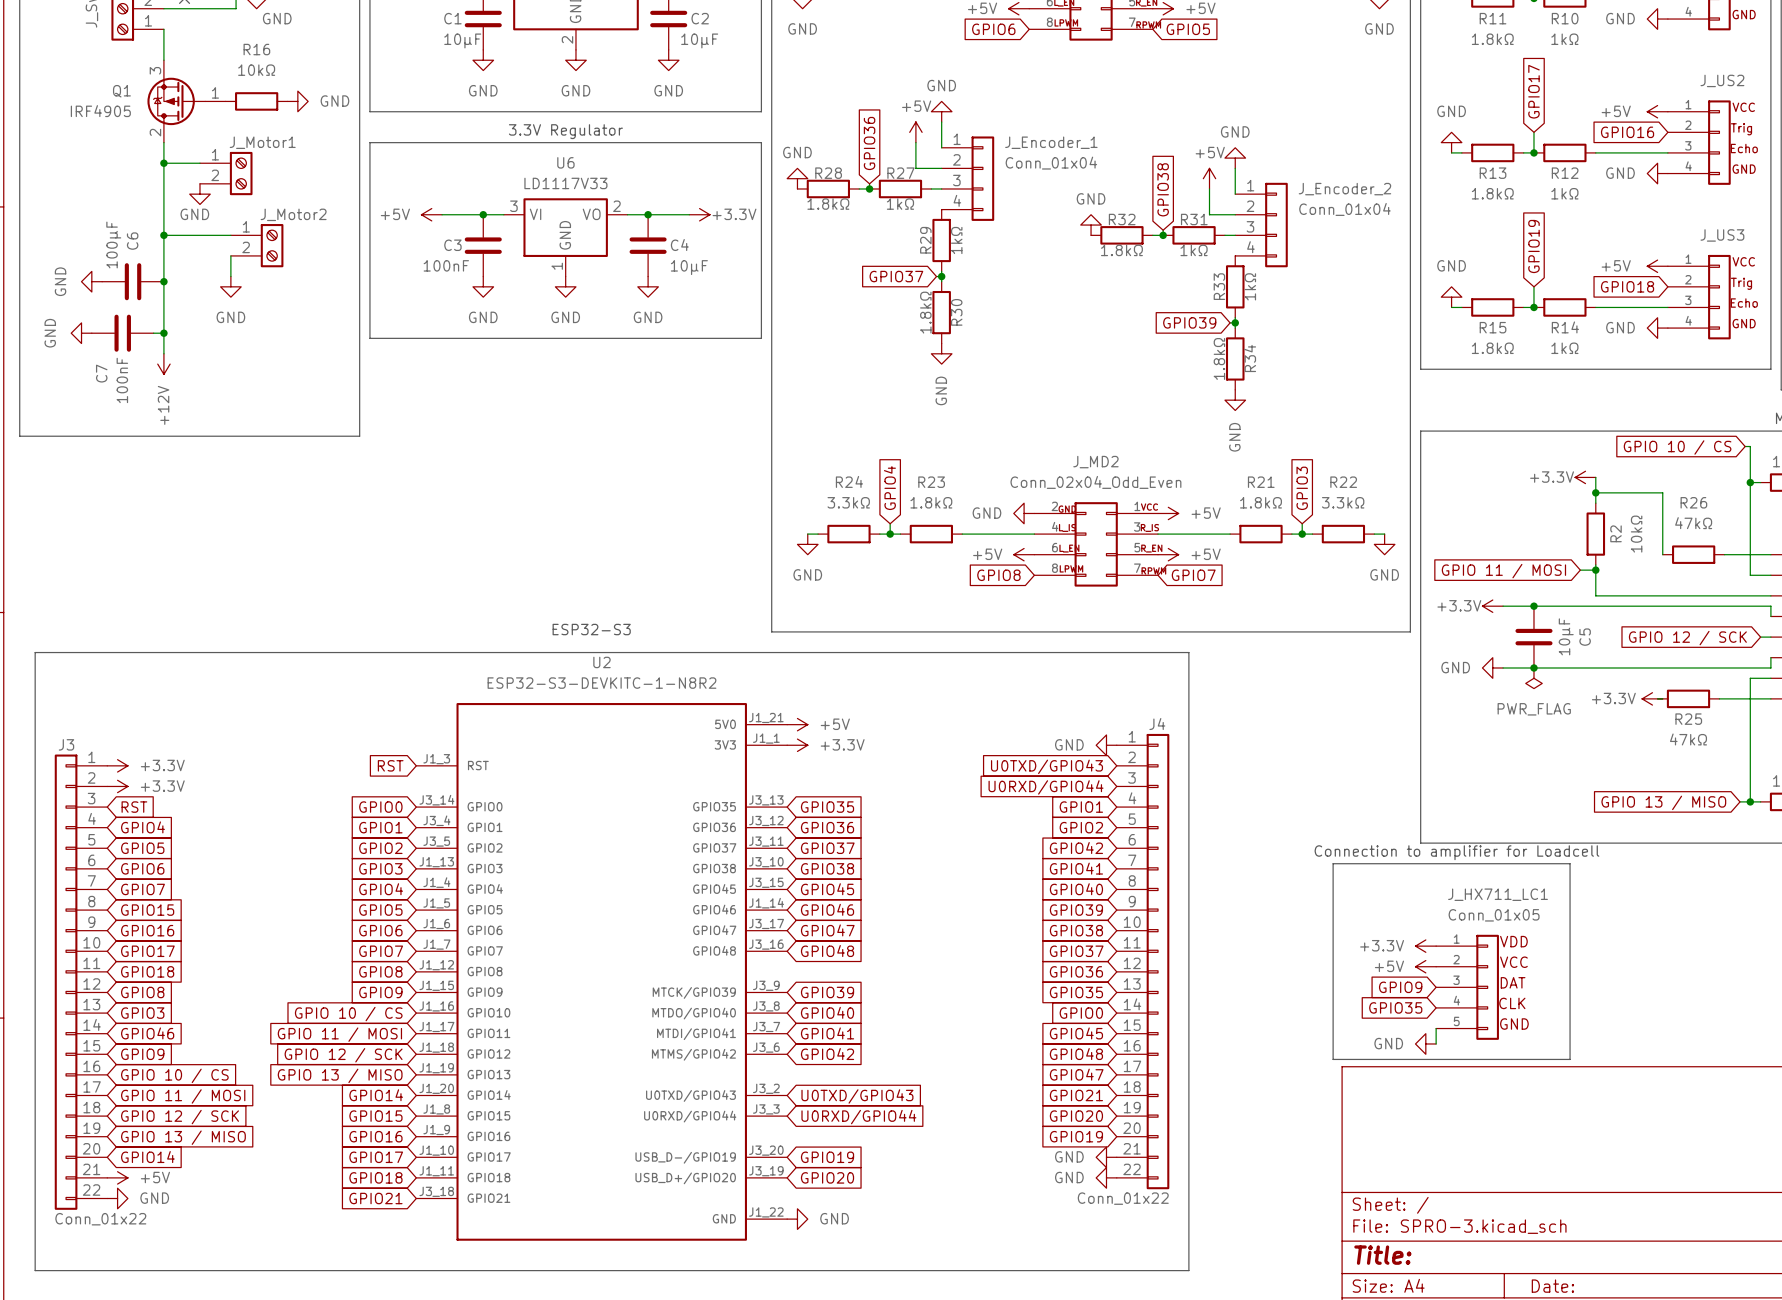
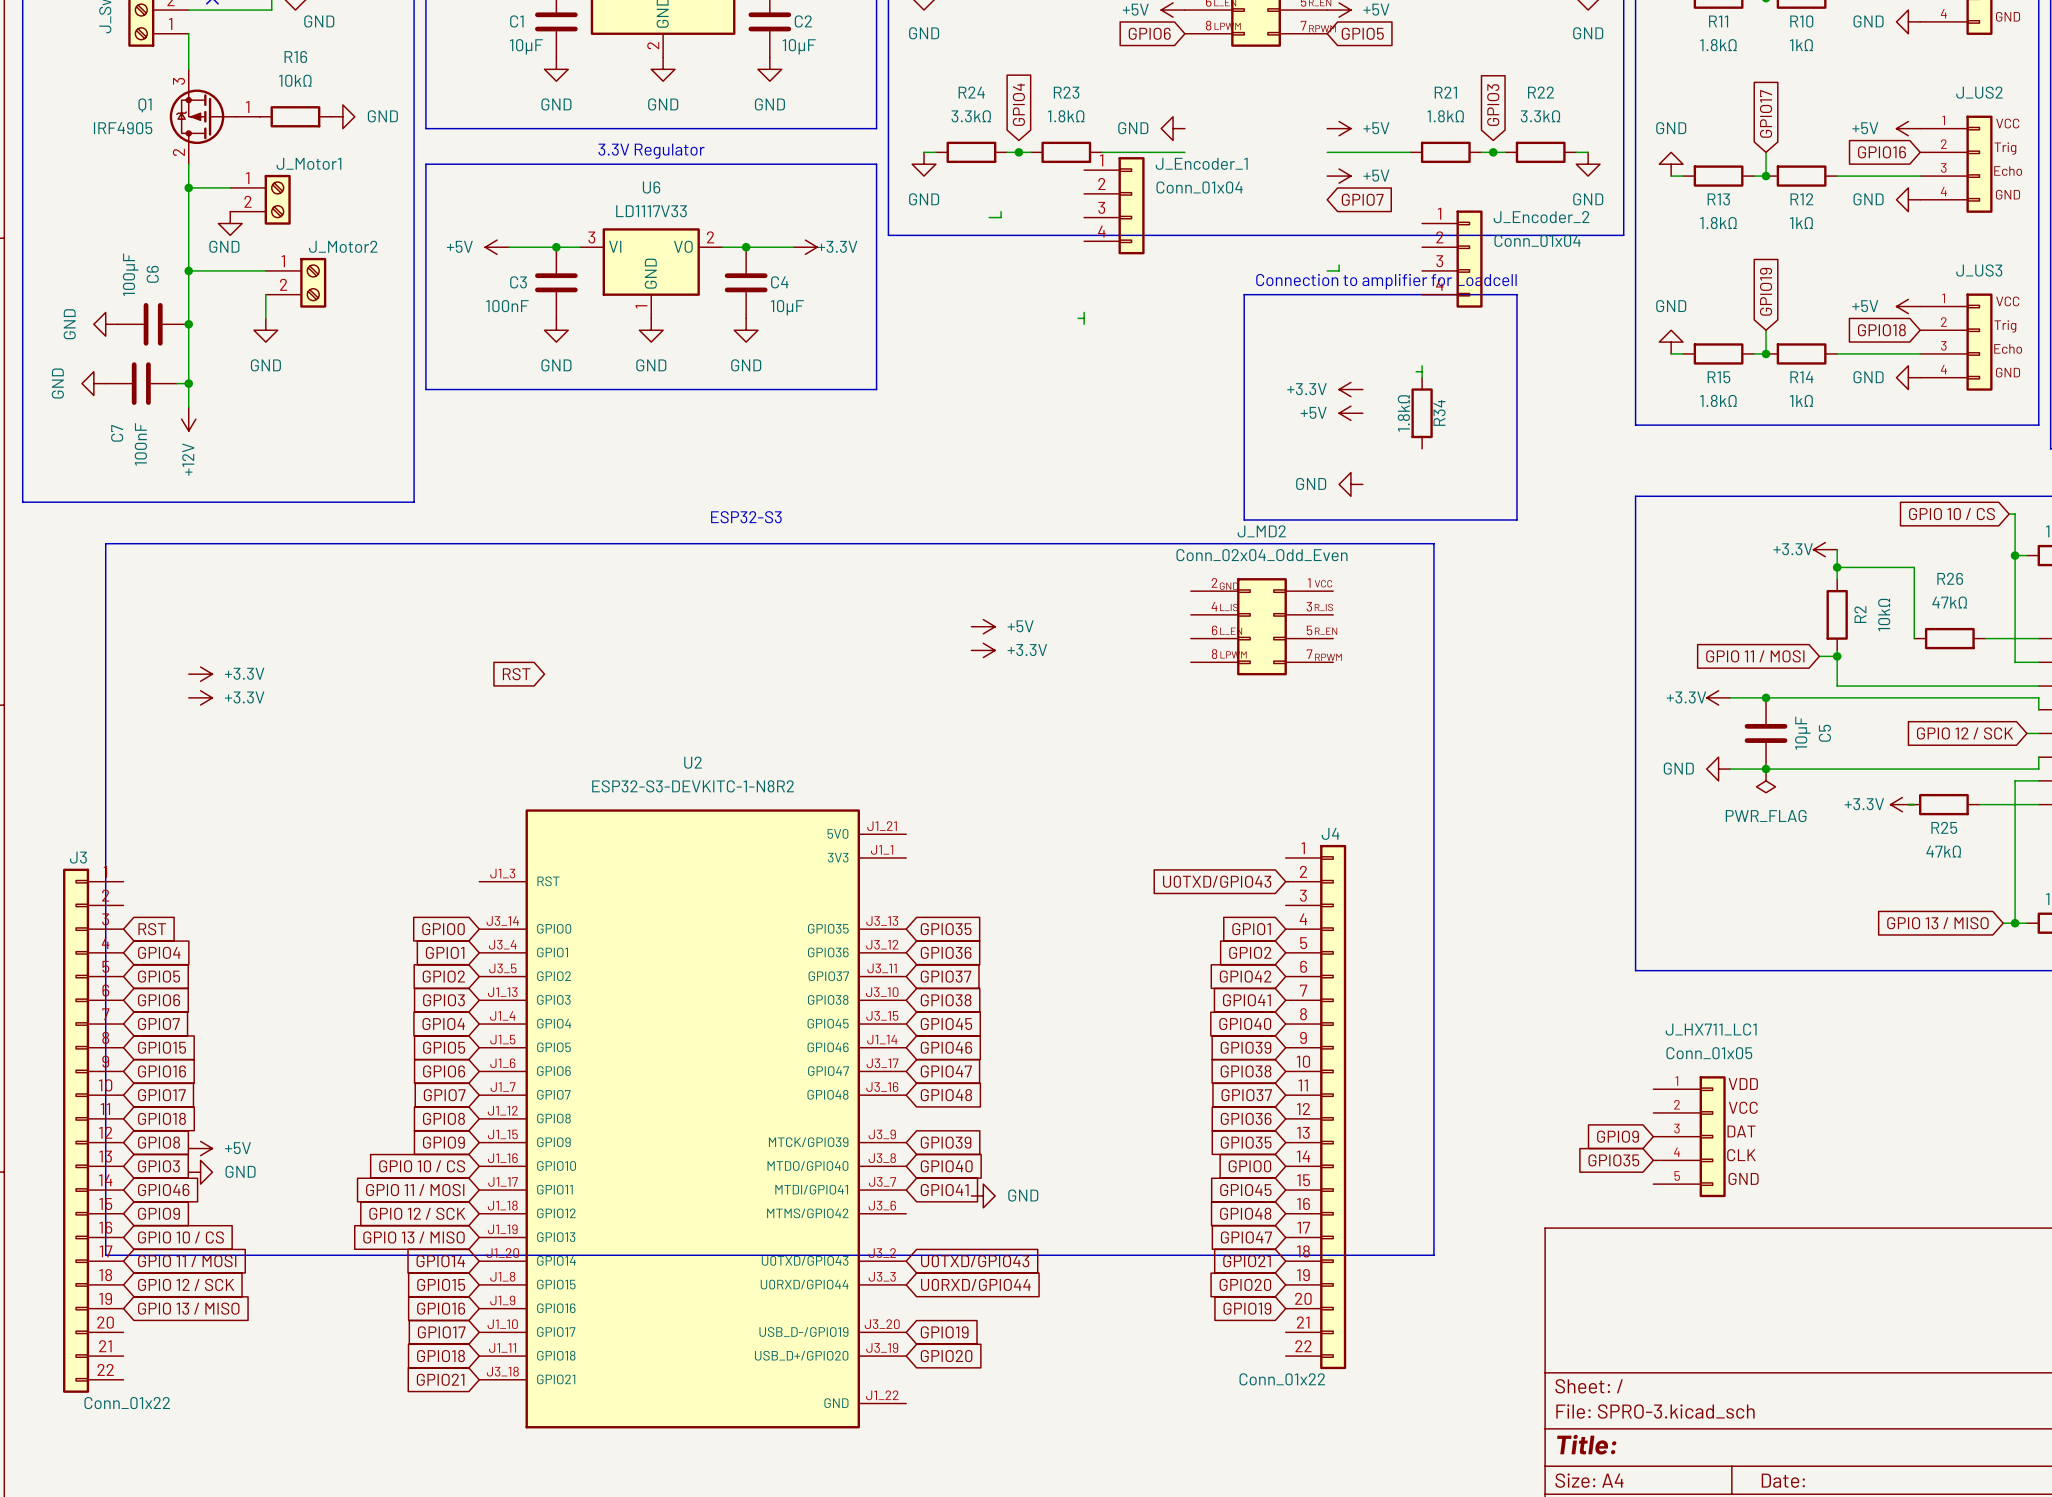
global label: none -> GPIO3 (1493, 105)
power symbol: GND (941, 111) -> none
power symbol: none -> GND (1173, 128)
power symbol: none -> +5V (1339, 128)
wire: (941, 122) (941, 147) -> none
wire: none -> (1007, 152) (1030, 152)
junction: none -> (1018, 152)
power symbol: +5V (915, 132) -> none
wire: none -> (1101, 152) (1184, 152)
wire: none -> (1327, 152) (1410, 152)
wire: none -> (1481, 152) (1505, 152)
junction: none -> (1493, 152)
wire: (915, 142) (915, 168) (941, 168) -> none
power symbol: none -> GND (1588, 164)
global label: GPIO36 (869, 143) -> GPIO4 (1018, 104)
power symbol: none -> +5V (1339, 176)
power symbol: GND (1235, 158) -> none
wire: (1235, 168) (1235, 194) -> none
power symbol rotation: 0° (797, 178) -> 180° (924, 164)
power symbol position: GND (797, 178) -> GND (924, 164)
power symbol: +5V (1209, 178) -> none
R28: 1.8kΩ (828, 188) -> none
junction: (869, 188) -> none
R27: 1kΩ (900, 188) -> none
wire: (931, 188) (941, 188) -> (924, 152) (935, 152)
wire: (1209, 188) (1209, 214) (1235, 214) -> none
global label: GPIO38 (1163, 189) -> GPIO7 (1362, 199)
line: (771, 204) (771, 631) (1410, 631) (1410, 204) -> (888, 235) (1623, 235)
power symbol: GND (1091, 225) -> none
R32: 1.8kΩ (1121, 235) -> none
junction: (1163, 235) -> none
R31: 1kΩ (1194, 235) -> none
wire: (1224, 235) (1235, 235) -> (1576, 152) (1588, 152)
R29: 1kΩ (941, 240) -> none
text: none -> Connection to amplifier for Loadcell (1386, 281)
line: none -> (1244, 294) (1516, 294) (1516, 519) (1244, 519) (1244, 294)
global label: GPIO37 (896, 276) -> none
junction: (941, 276) -> none
R33: 1kΩ (1235, 286) -> none
R30: 1.8kΩ (941, 312) -> none
global label: GPIO39 (1189, 322) -> none
junction: (1235, 322) -> none
power symbol: none -> +3.3V (1350, 389)
power symbol: GND (941, 353) -> none
power symbol: none -> +5V (1350, 413)
power symbol rotation: 0° (1235, 400) -> 90° clockwise (1350, 484)
power symbol position: GND (1235, 400) -> GND (1350, 484)
global label: GPIO4 (889, 488) -> none
global label: GPIO3 (1302, 488) -> none
power symbol: GND (1024, 513) -> none
power symbol: +5V (1168, 513) -> none
wire: (890, 523) (890, 534) -> none
wire: (1302, 523) (1302, 534) -> none
wire: (807, 534) (818, 534) -> none
R24 position: (848, 534) -> (971, 152)
wire: (879, 534) (900, 534) -> none
junction: (890, 534) -> none
R23 position: (931, 534) -> (1066, 152)
wire: (962, 534) (1034, 534) -> none
wire: (1157, 534) (1230, 534) -> none
R21 position: (1261, 534) -> (1445, 152)
wire: (1291, 534) (1312, 534) -> none
junction: (1302, 534) -> none
R22 position: (1343, 534) -> (1540, 152)
wire: (1374, 534) (1384, 534) -> none
power symbol: GND (807, 544) -> none
power symbol: none -> +5V (983, 626)
power symbol: GND (1384, 544) -> none
power symbol: +5V (1024, 554) -> none
power symbol: +5V (1168, 554) -> none
global label: GPIO8 (998, 575) -> none
global label: GPIO7 (1193, 575) -> none
power symbol: none -> +3.3V (200, 674)
power symbol: none -> +3.3V (200, 697)
text position: ESP32-S3 (591, 629) -> ESP32-S3 (746, 517)
line: (35, 652) (1188, 652) (1188, 1270) (35, 1270) (35, 652) -> (105, 543) (1433, 543) (1433, 1255) (105, 1255) (105, 543)
power symbol: +5V (797, 724) -> none
power symbol position: +3.3V (797, 745) -> +3.3V (983, 650)
power symbol: GND (1106, 745) -> none
power symbol: +3.3V (117, 765) -> none
global label position: RST (390, 765) -> RST (516, 674)
power symbol: +3.3V (117, 786) -> none
global label: U0RXD/GPIO44 (1046, 787) -> none
text: Connection to amplifier for Loadcell (1456, 852) -> none
line: (1333, 863) (1570, 863) (1570, 1059) (1333, 1059) (1333, 863) -> none
power symbol: +3.3V (1425, 946) -> none
power symbol: +5V (1425, 966) -> none
wire: (1436, 1028) (1436, 1043) -> none
power symbol: none -> GND (983, 1195)
power symbol: GND (1425, 1043) -> none
global label: GPIO42 (827, 1054) -> none
global label: GPIO14 (147, 1157) -> none
power symbol: GND (1106, 1157) -> none
power symbol position: +5V (117, 1177) -> +5V (200, 1148)
power symbol: GND (1106, 1177) -> none
power symbol position: GND (117, 1198) -> GND (200, 1172)
power symbol: GND (797, 1219) -> none

